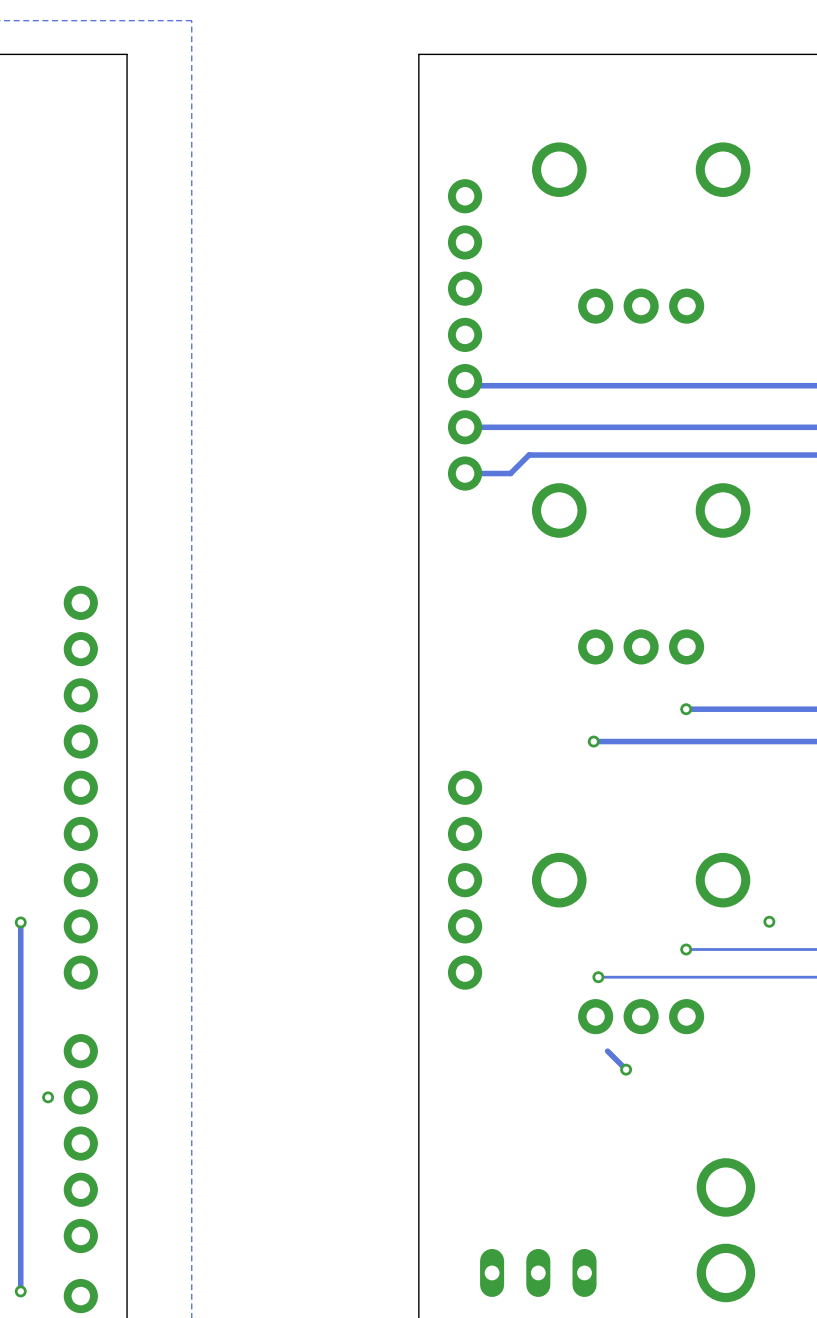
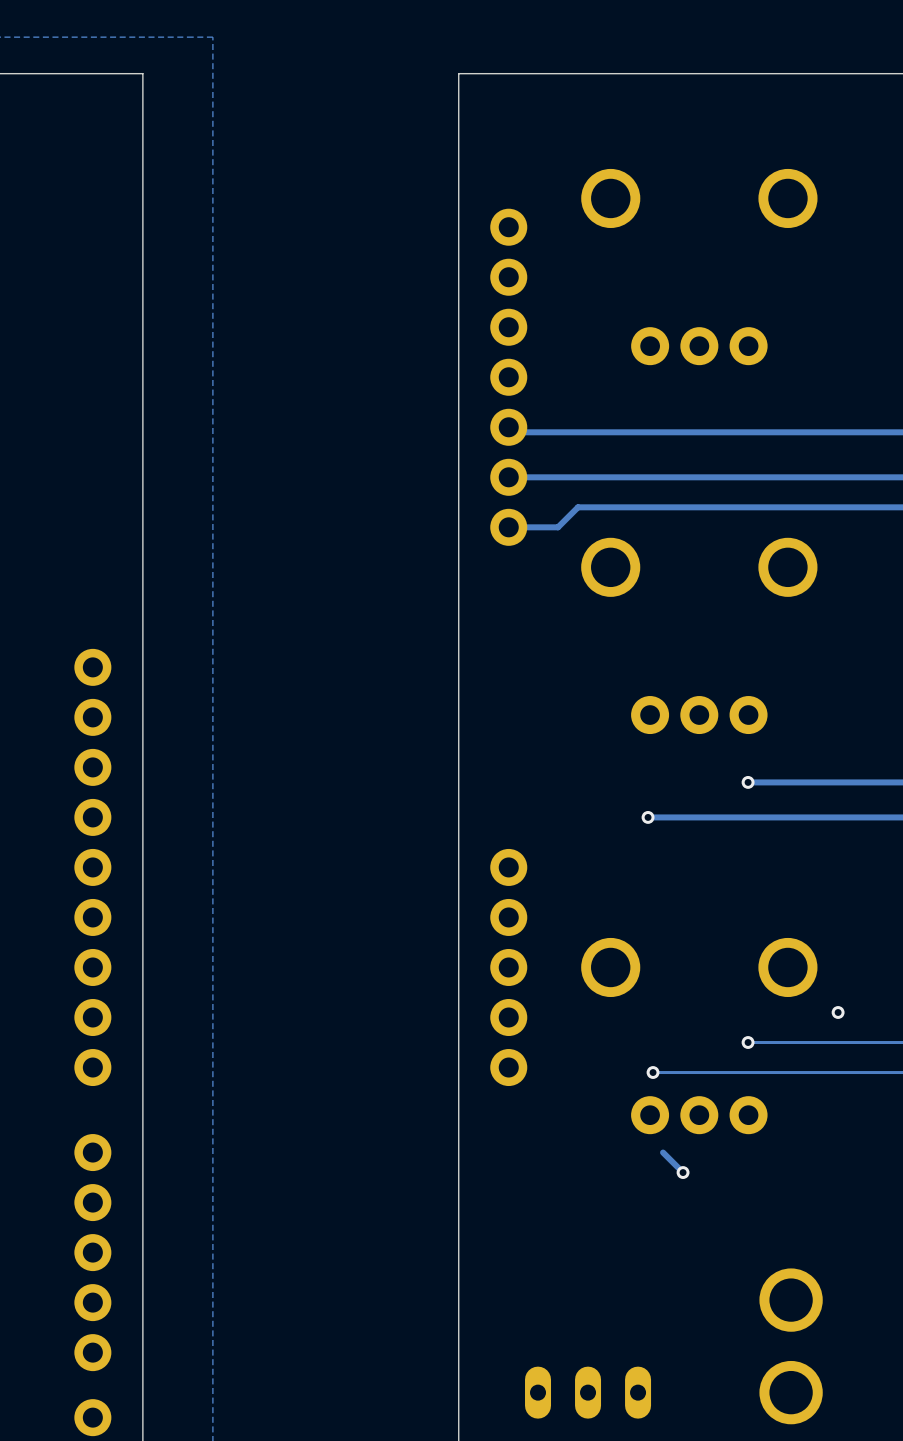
track: (20, 922) (20, 1291) -> none
via: (20, 922) -> none
via: (48, 1097) -> none
via: (20, 1291) -> none

